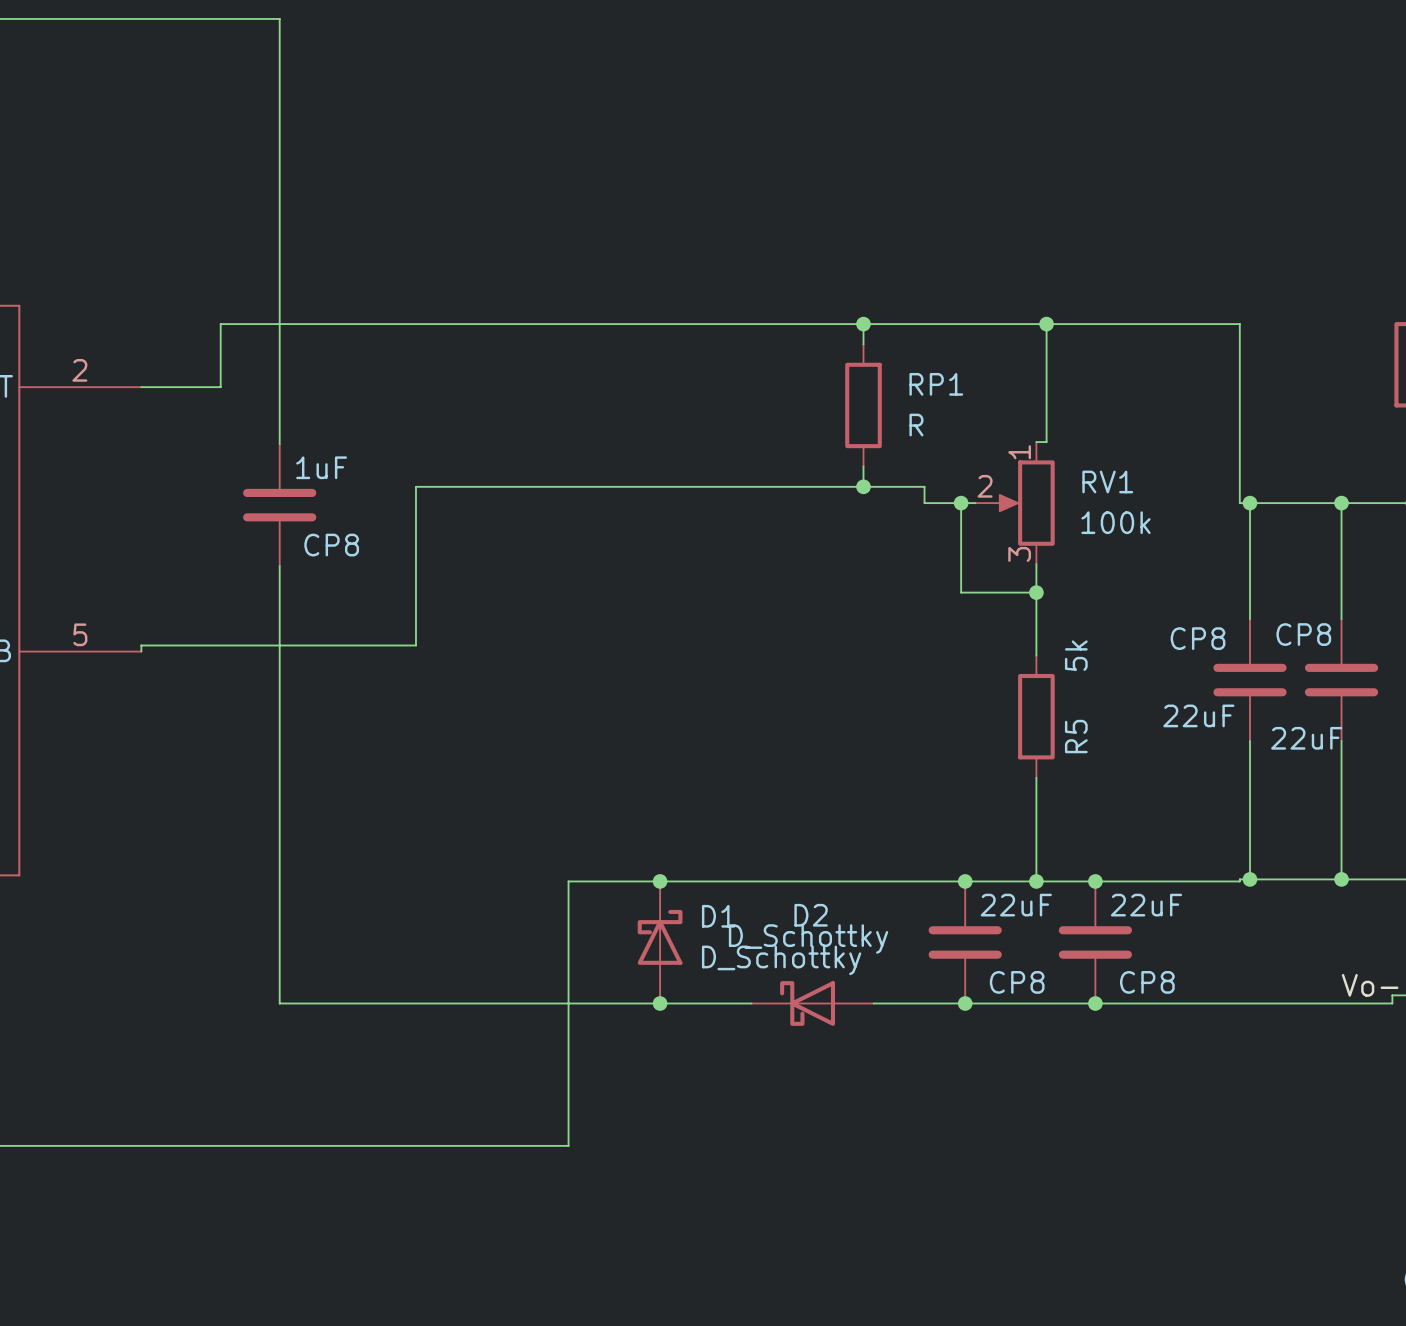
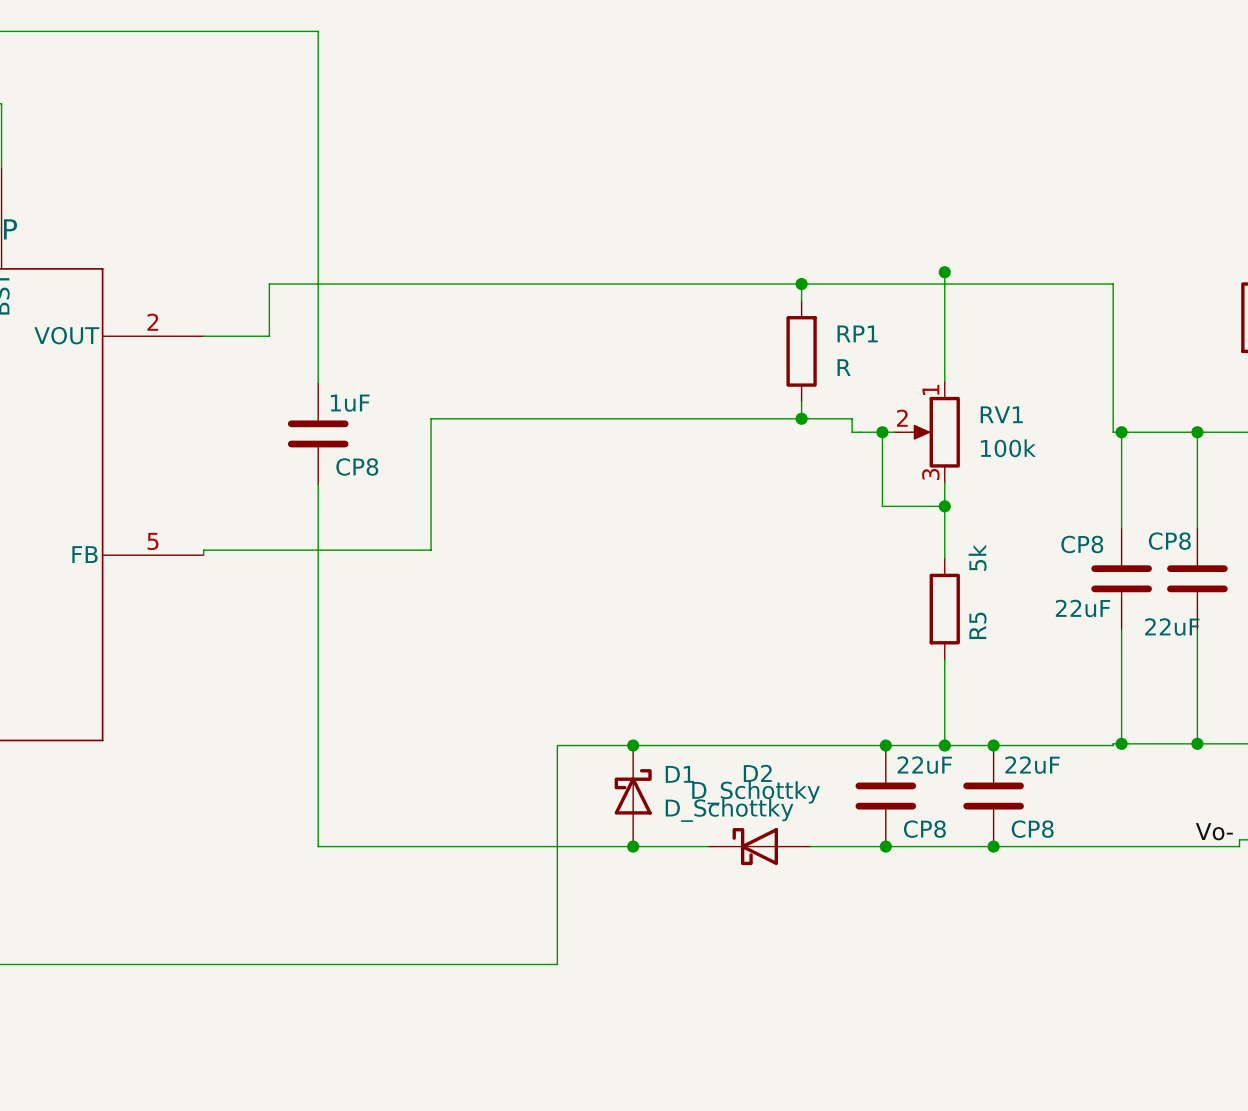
wire: (1046, 324) (1046, 442) (1036, 442) -> (944, 272) (944, 381)
junction position: (1046, 324) -> (944, 272)

